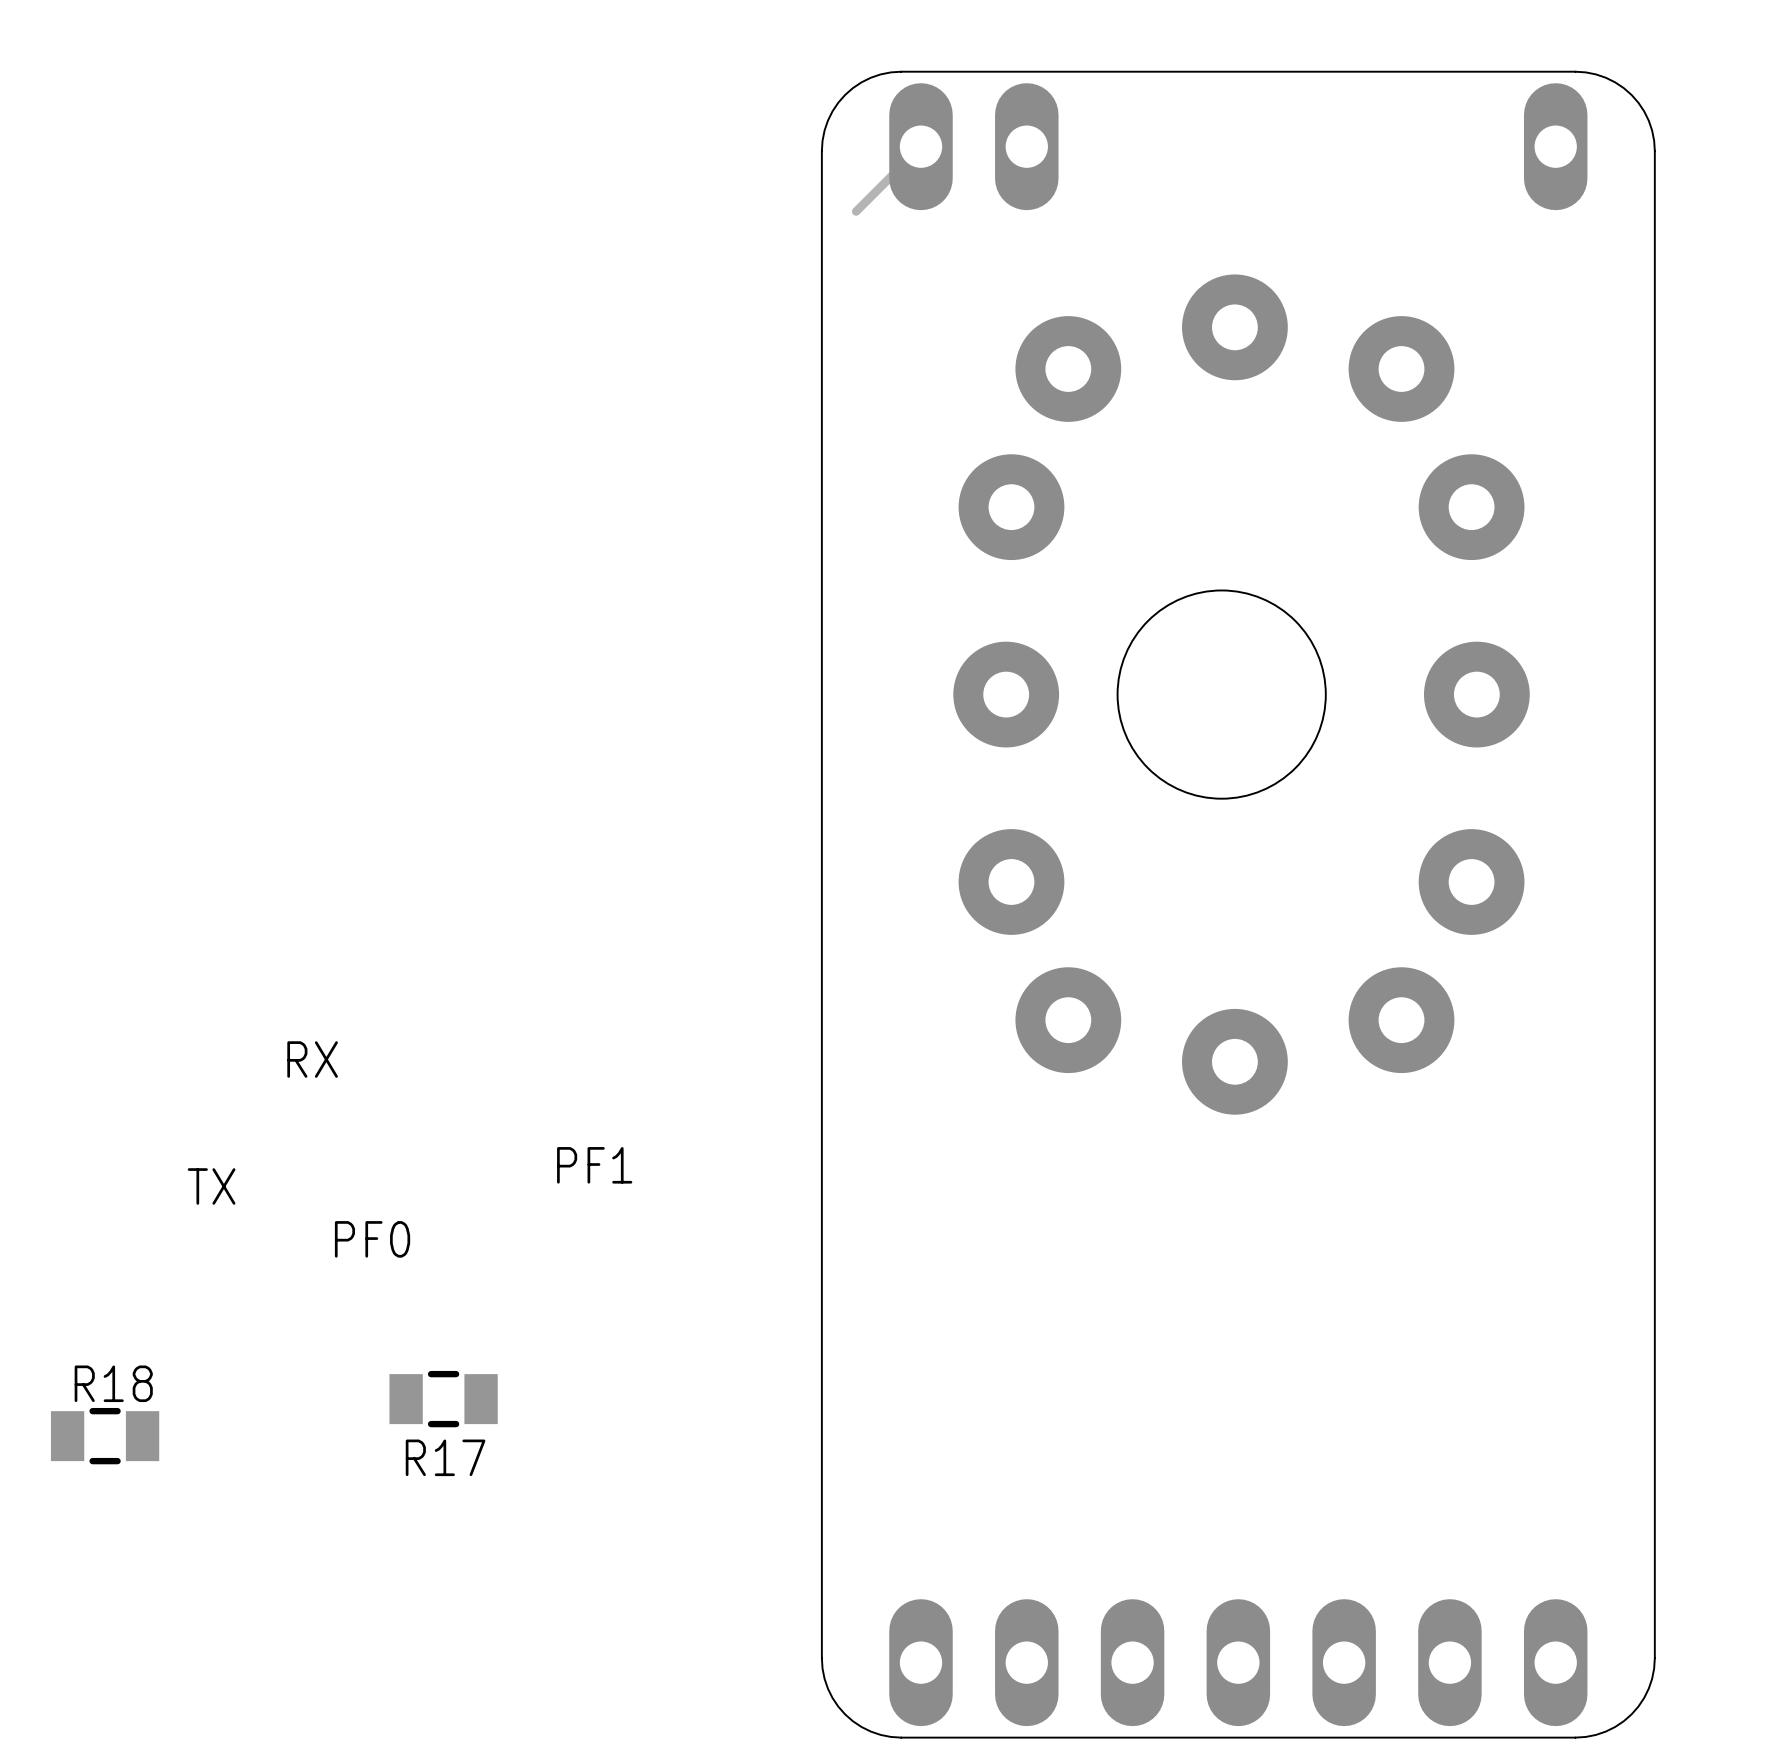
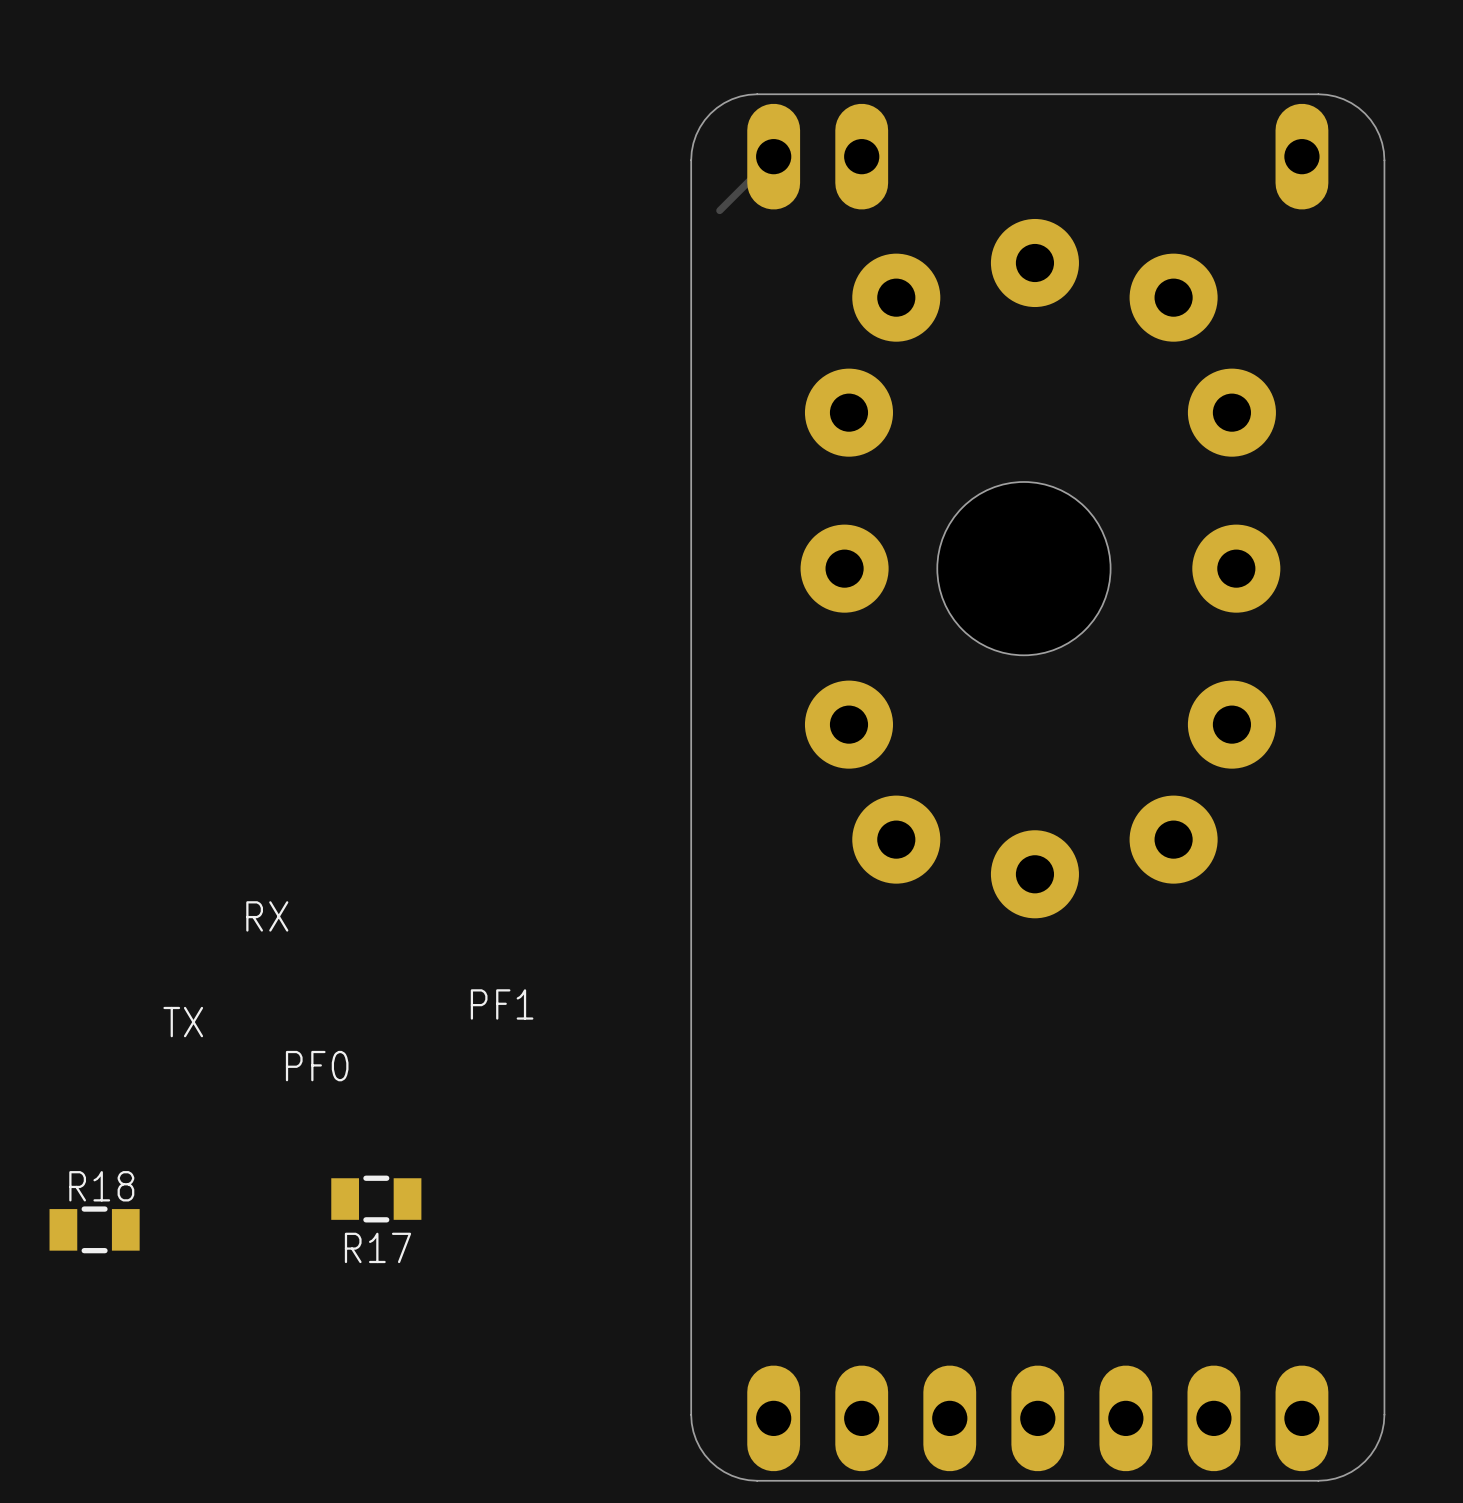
part position: (1241, 694) -> (1040, 568)

